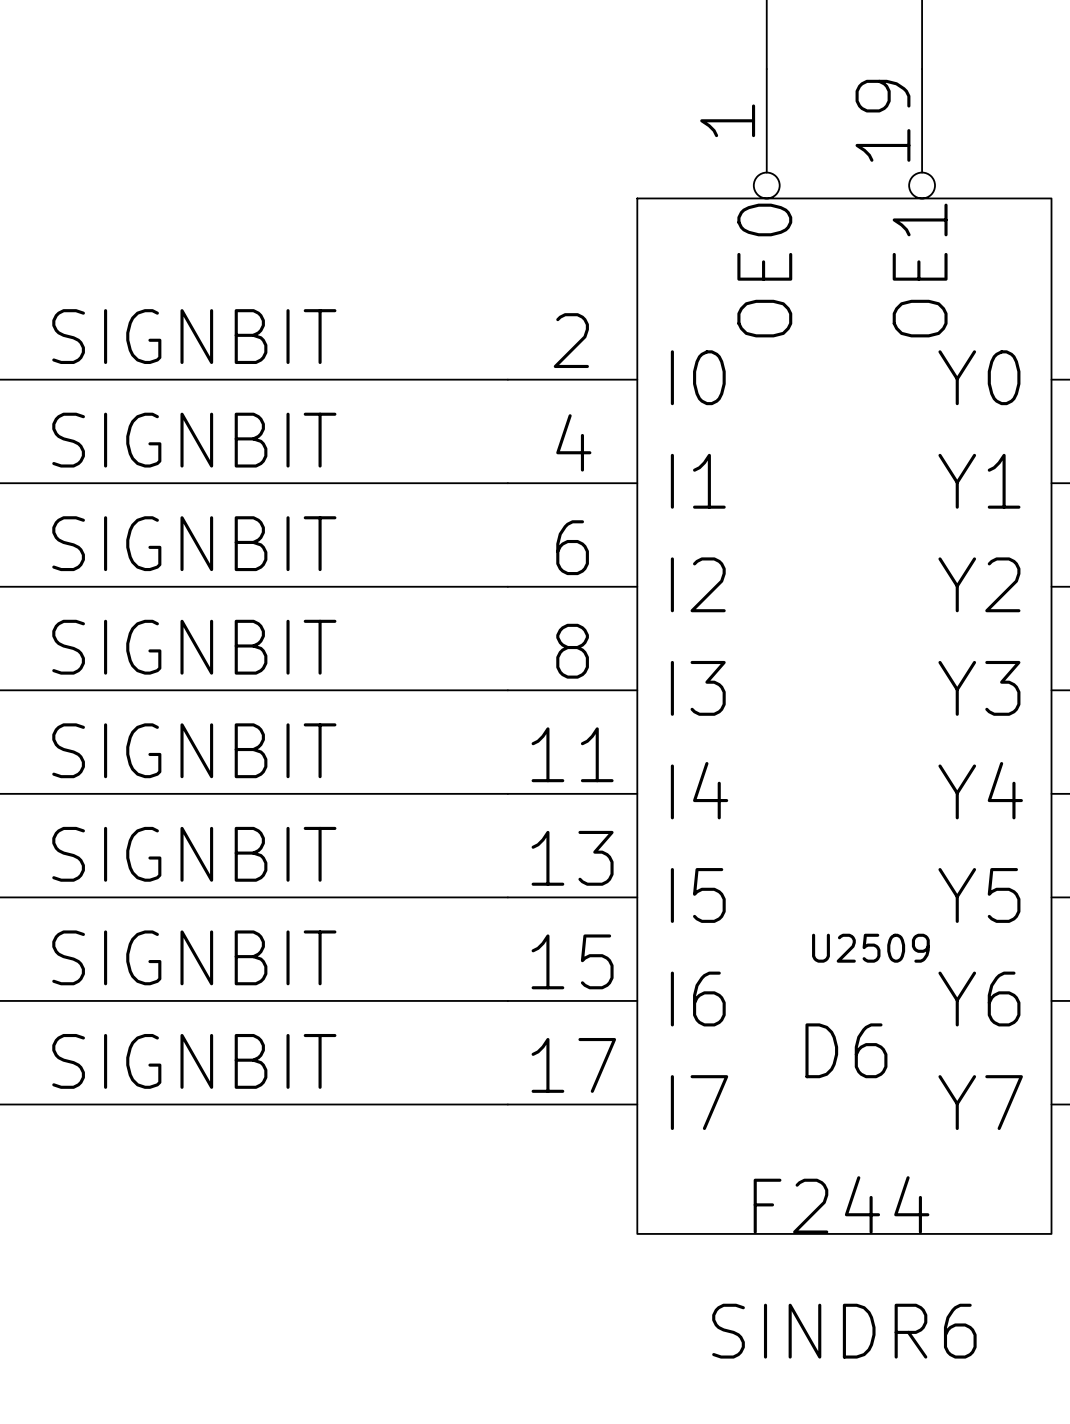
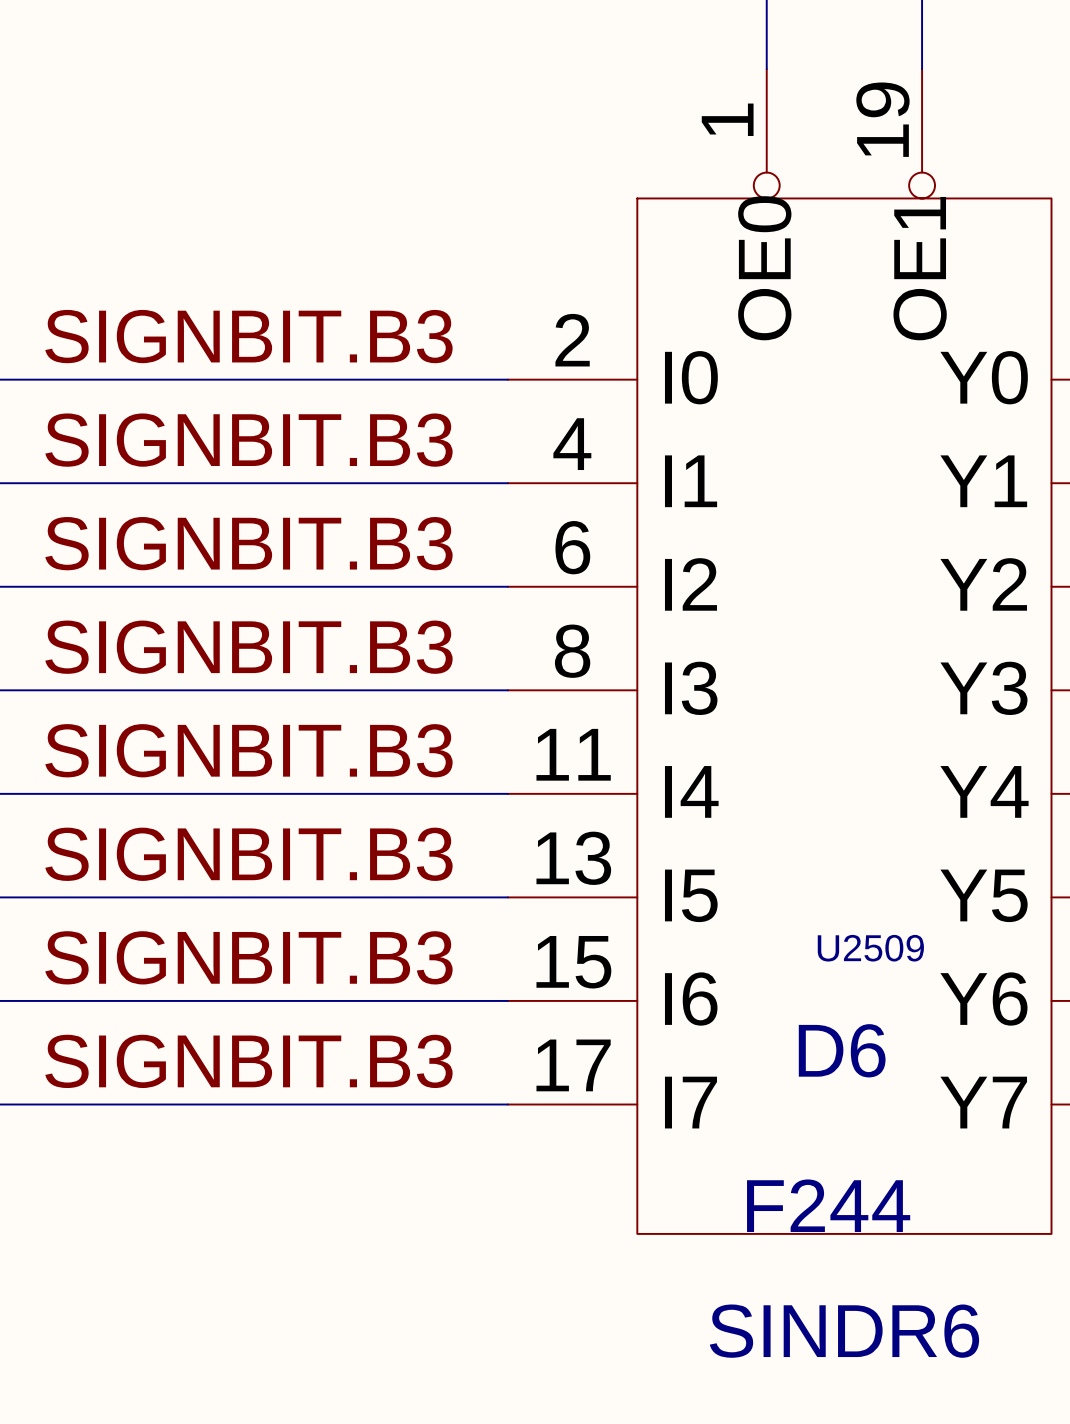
label: SIGNBIT (194, 336) -> SIGNBIT.B3 (248, 336)
label: SIGNBIT (194, 440) -> SIGNBIT.B3 (248, 440)
label: SIGNBIT (194, 543) -> SIGNBIT.B3 (248, 543)
label: SIGNBIT (194, 647) -> SIGNBIT.B3 (248, 647)
label: SIGNBIT (194, 750) -> SIGNBIT.B3 (248, 750)
label: SIGNBIT (194, 854) -> SIGNBIT.B3 (248, 854)
label: SIGNBIT (194, 957) -> SIGNBIT.B3 (248, 957)
label: SIGNBIT (194, 1061) -> SIGNBIT.B3 (248, 1061)

